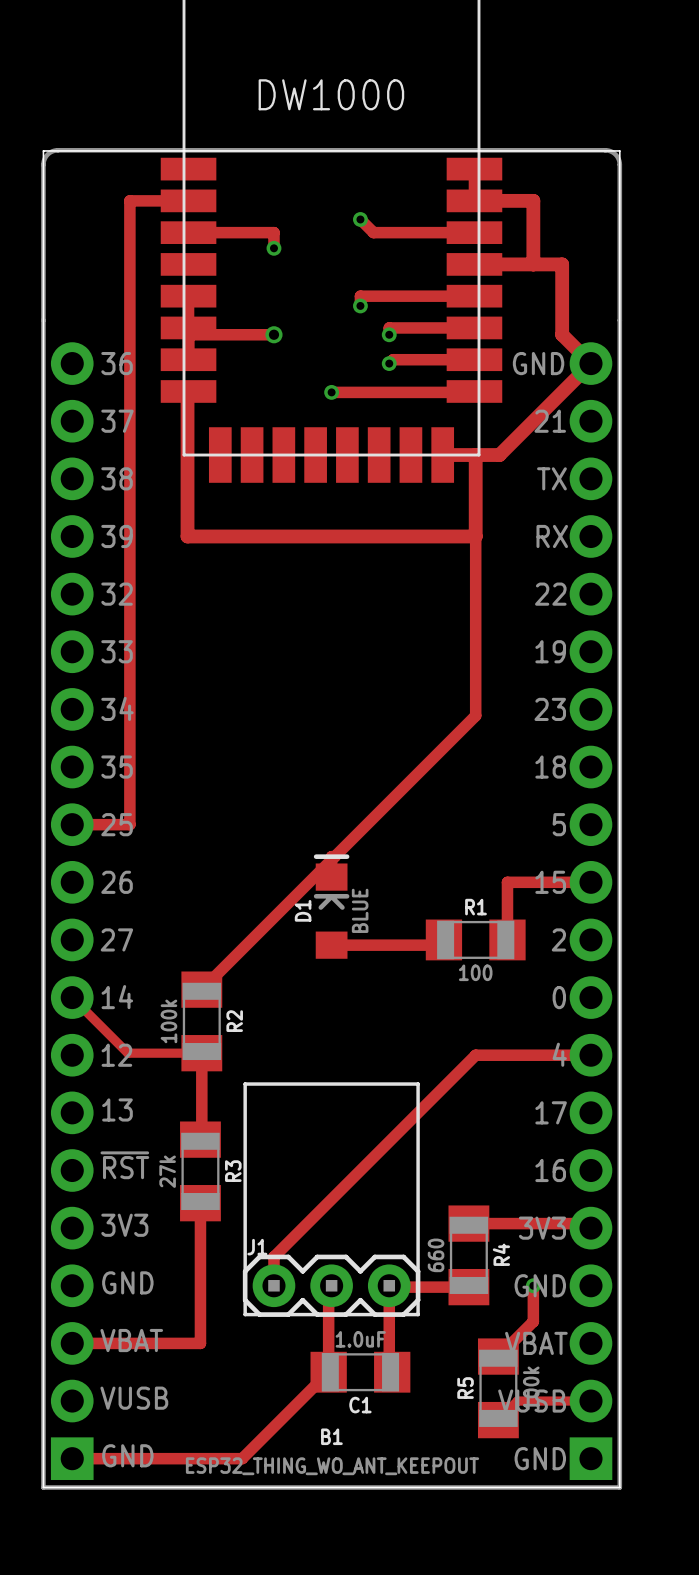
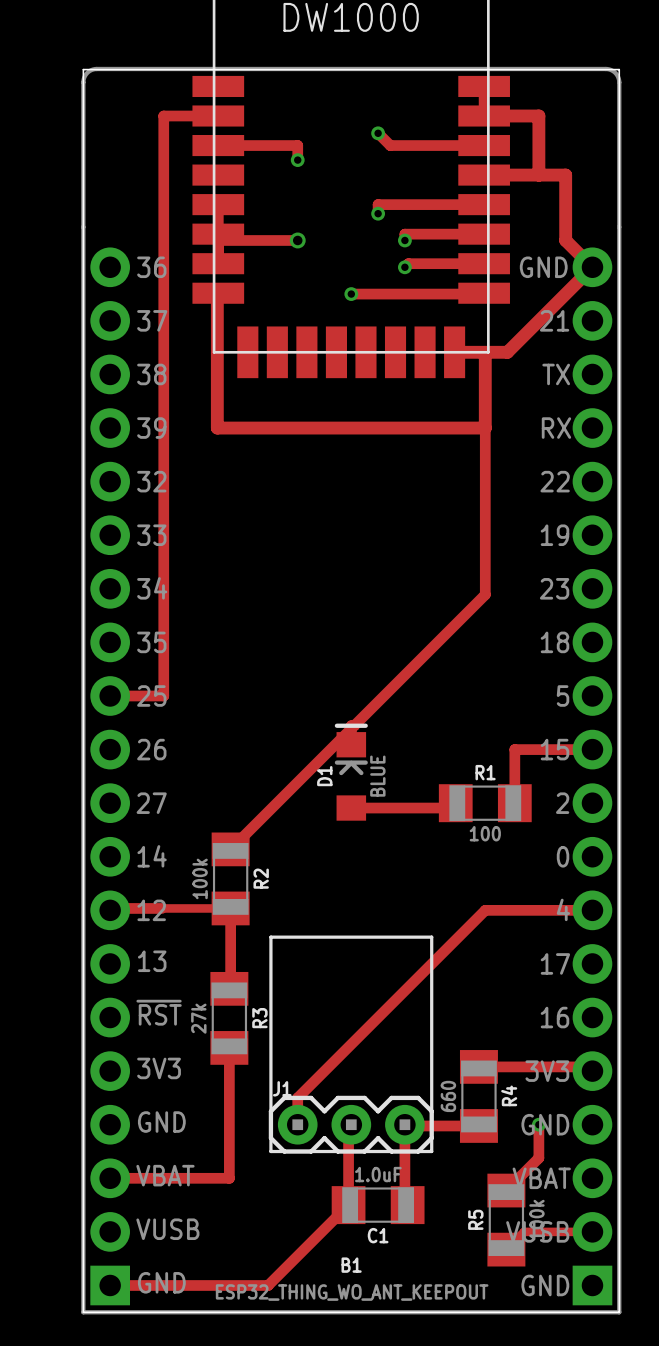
track: (72, 997) (127, 1053) -> (110, 910) (110, 908) (161, 908)

